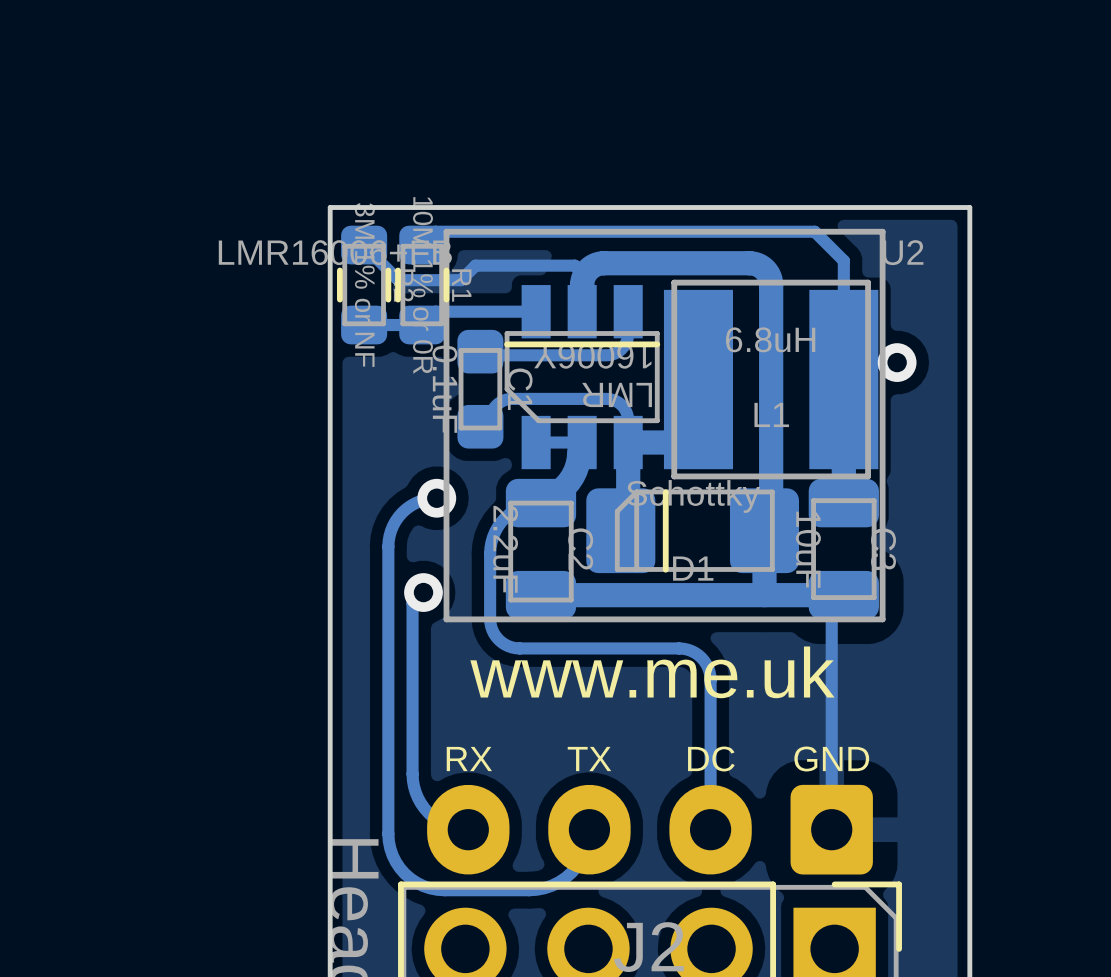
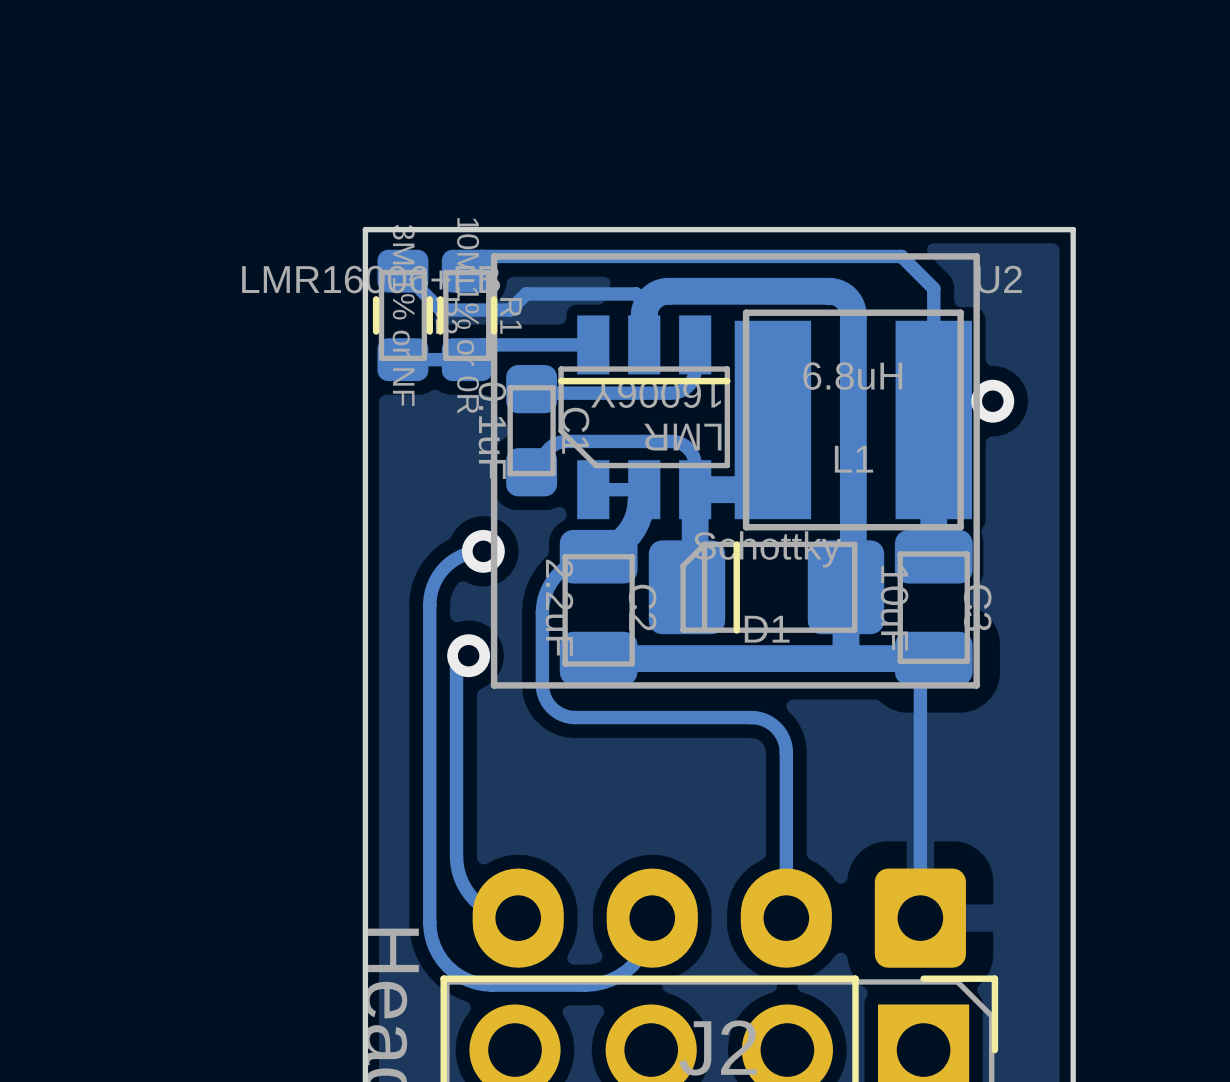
text: www.me.uk (652, 672) -> none
text: DC (711, 758) -> none
text: GND (831, 758) -> none
text: RX (469, 759) -> none
text: TX (589, 759) -> none

